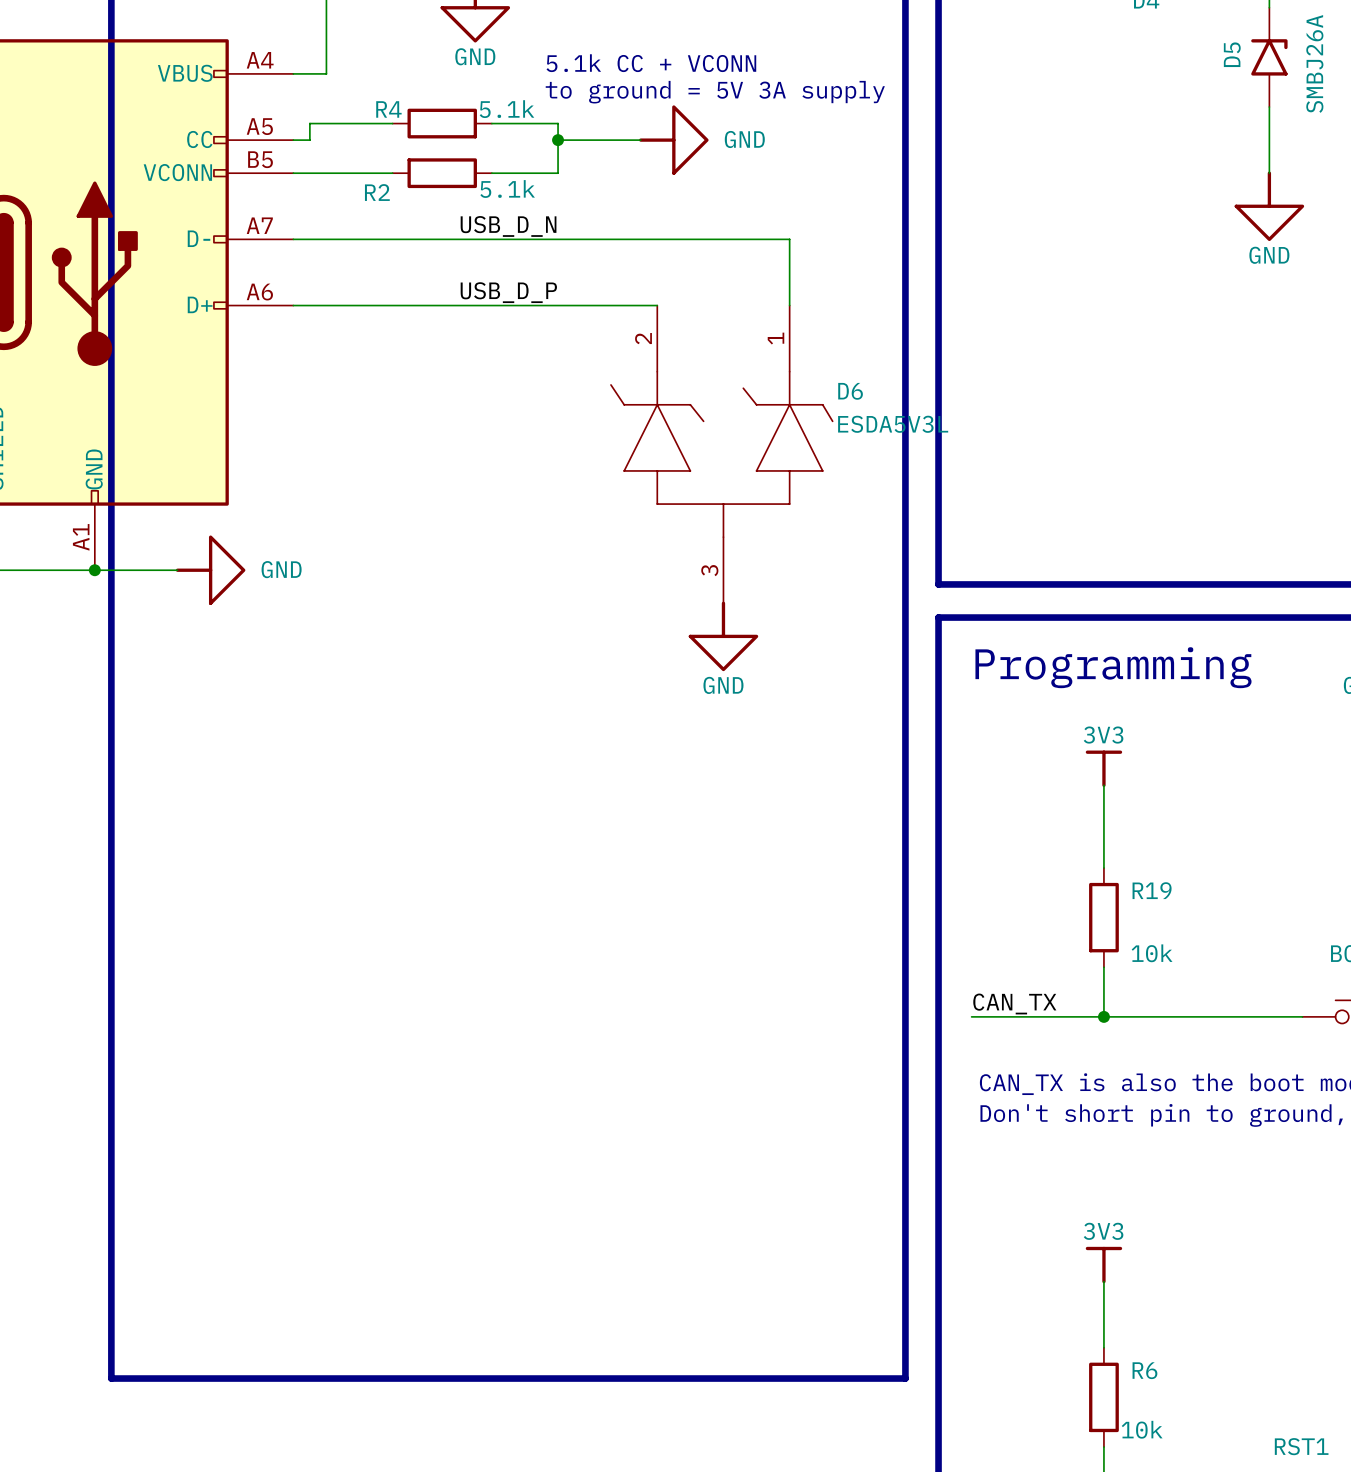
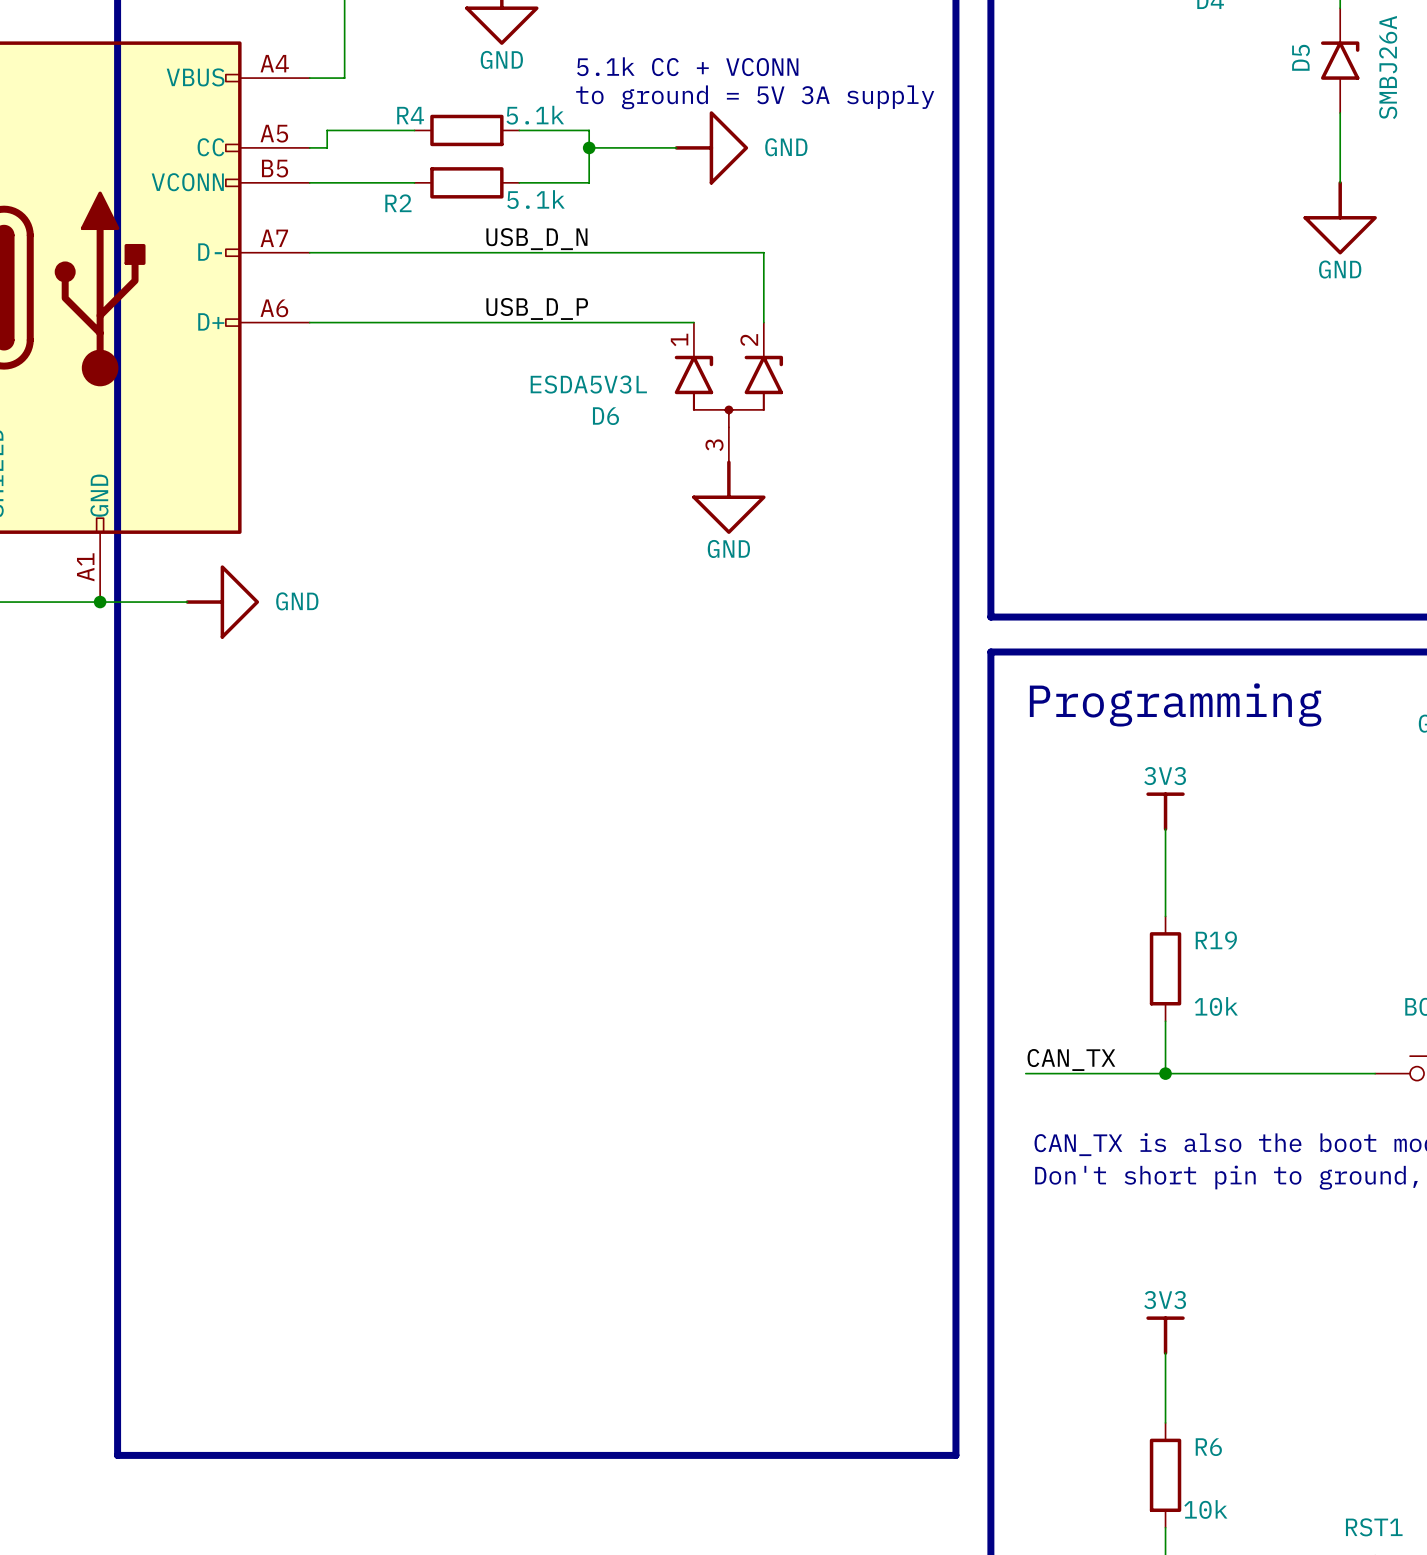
wire: (723, 239) (789, 239) (789, 305) -> (763, 252) (763, 322)
D6 symbol: [610, 305, 833, 604] -> [674, 322, 784, 463]
D6 name position: D6 (850, 391) -> D6 (605, 416)
D6 value position: ESDA5V3L (893, 424) -> ESDA5V3L (588, 384)
power symbol position: GND (723, 636) -> GND (728, 497)

